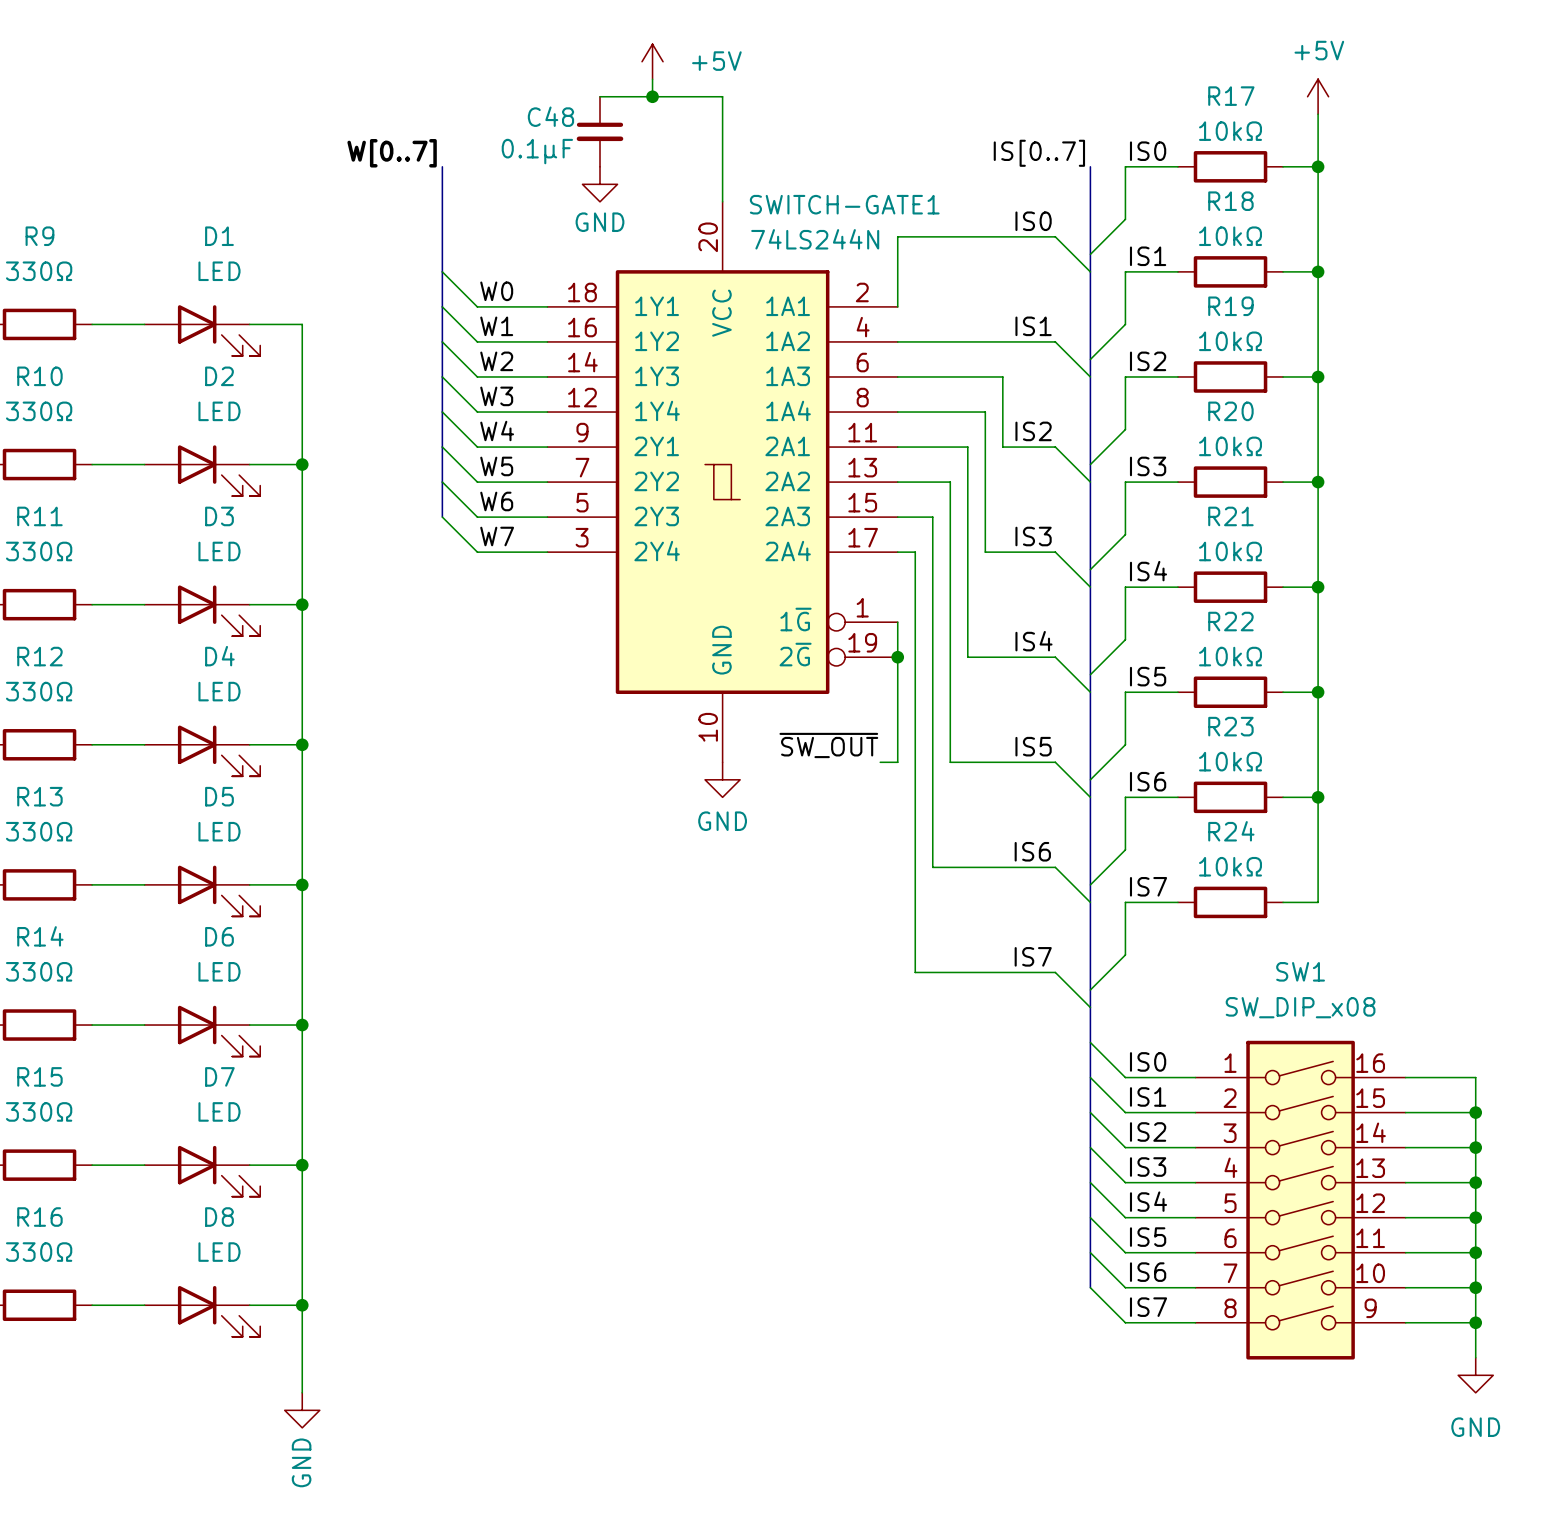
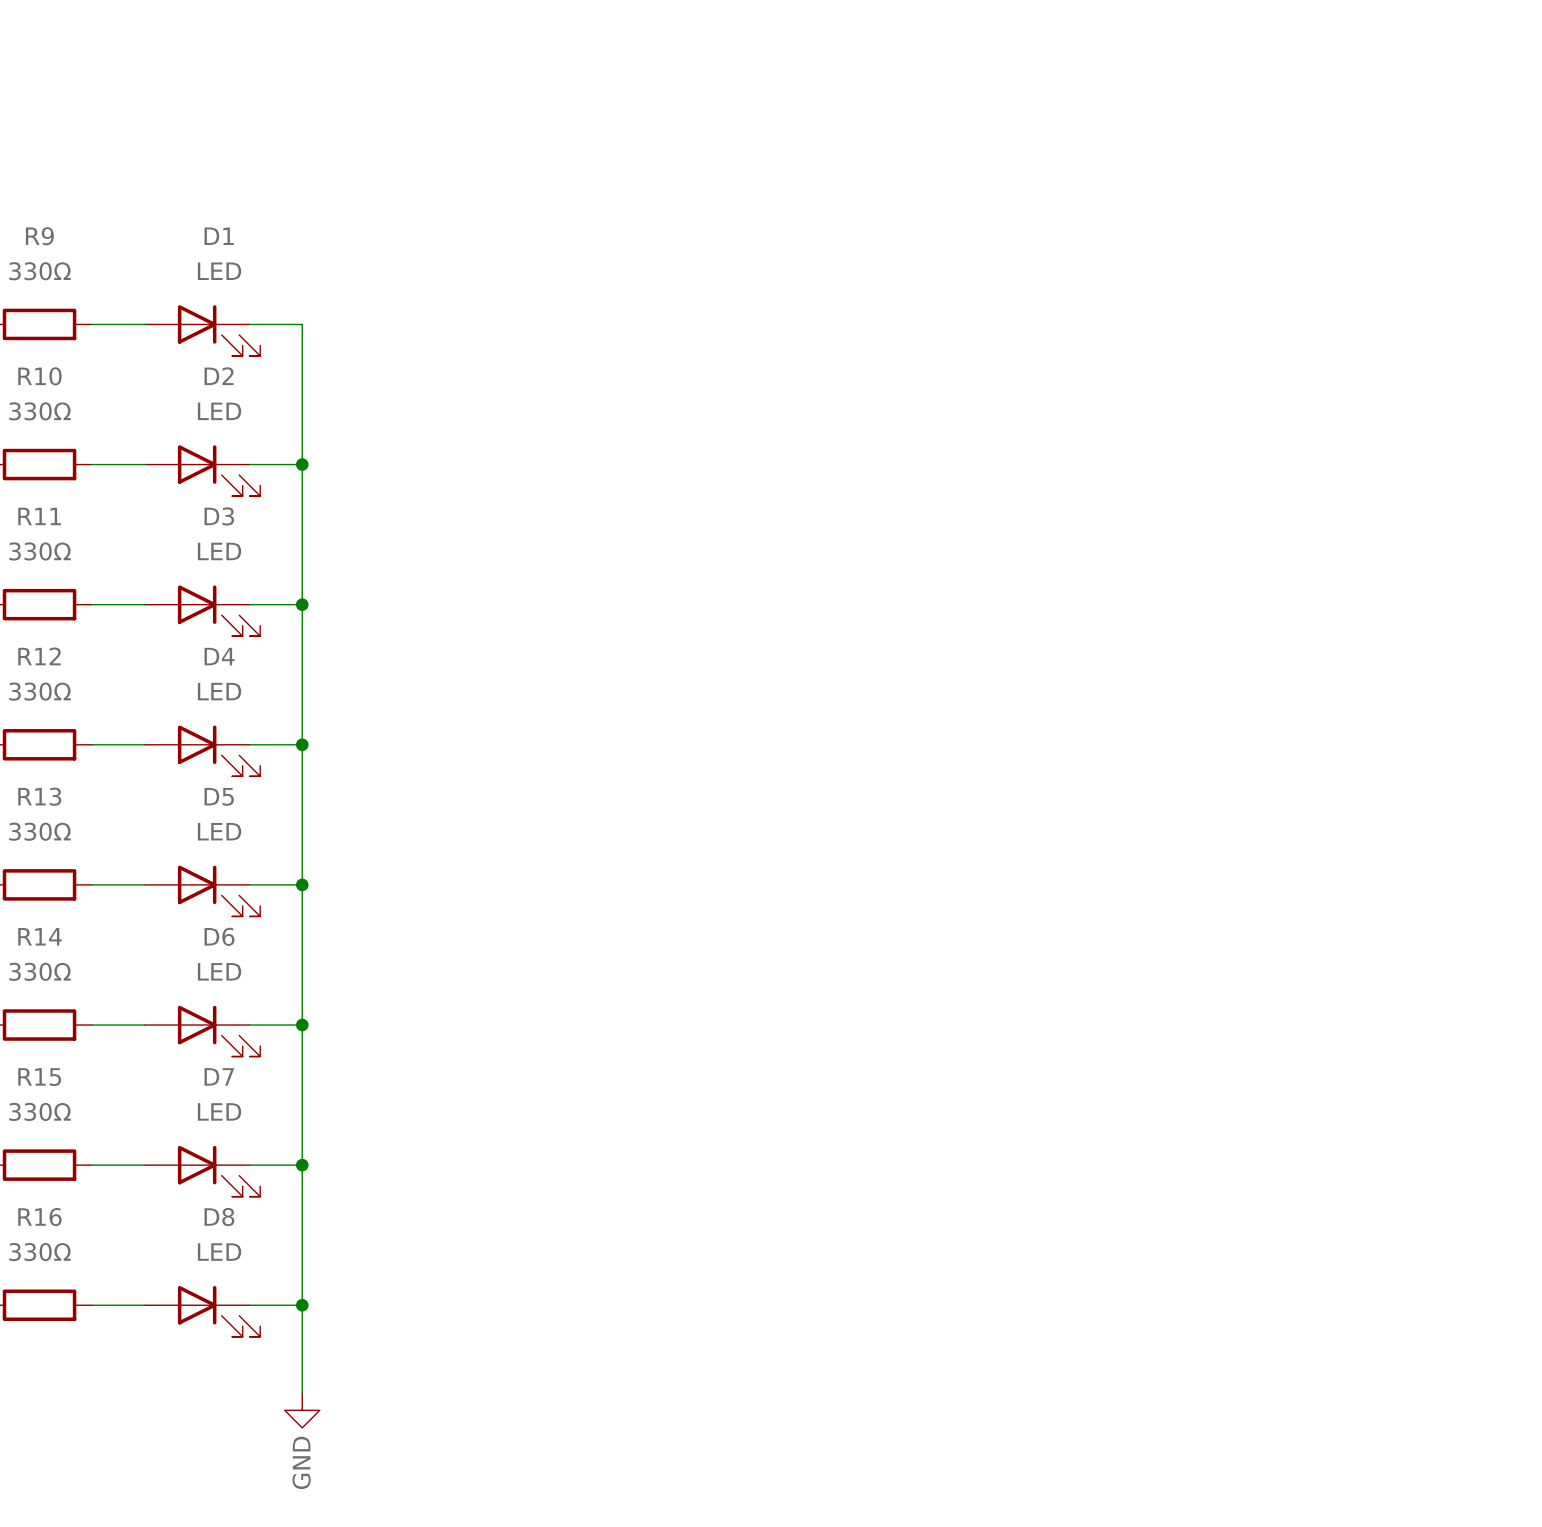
power symbol: +5V (652, 61) -> none
wire: (652, 79) (652, 96) -> none
wire: (600, 96) (722, 96) (722, 201) -> none
junction: (652, 96) -> none
power symbol: +5V (1318, 96) -> none
wire: (1318, 114) (1318, 902) (1283, 902) -> none
C48: 0.1µF (600, 131) -> none
label: IS0 (1148, 151) -> none
label: W[0..7] (392, 153) -> none
label: IS[0..7] (1039, 153) -> none
bus: (442, 166) (442, 517) -> none
bus: (1090, 166) (1090, 1287) -> none
wire: (1177, 166) (1125, 166) (1125, 219) (1090, 254) -> none
R17: 10kΩ (1230, 166) -> none
wire: (1283, 166) (1318, 166) -> none
junction: (1318, 166) -> none
power symbol: GND (600, 184) -> none
label: IS0 (1033, 221) -> none
label: IS1 (1148, 256) -> none
wire: (442, 271) (477, 306) (547, 306) -> none
wire: (1090, 271) (1055, 236) (897, 236) (897, 306) -> none
wire: (1177, 271) (1125, 271) (1125, 324) (1090, 359) -> none
R18: 10kΩ (1230, 271) -> none
wire: (1283, 271) (1318, 271) -> none
junction: (1318, 271) -> none
label: W0 (496, 291) -> none
wire: (442, 306) (477, 341) (547, 341) -> none
label: W1 (496, 326) -> none
label: IS1 (1033, 326) -> none
wire: (442, 341) (477, 376) (547, 376) -> none
wire: (897, 341) (1055, 341) (1090, 376) -> none
label: W2 (496, 361) -> none
label: IS2 (1148, 361) -> none
wire: (442, 376) (477, 412) (547, 412) -> none
wire: (897, 376) (1002, 376) (1002, 447) (1055, 447) (1090, 482) -> none
wire: (1177, 376) (1125, 376) (1125, 429) (1090, 464) -> none
R19: 10kΩ (1230, 376) -> none
wire: (1283, 376) (1318, 376) -> none
junction: (1318, 376) -> none
label: W3 (496, 396) -> none
wire: (442, 412) (477, 447) (547, 447) -> none
wire: (897, 412) (985, 412) (985, 552) (1055, 552) (1090, 587) -> none
label: W4 (497, 431) -> none
label: IS2 (1033, 431) -> none
wire: (442, 447) (477, 482) (547, 482) -> none
wire: (897, 447) (967, 447) (967, 657) (1055, 657) (1090, 692) -> none
label: W5 (496, 466) -> none
label: IS3 (1148, 466) -> none
wire: (442, 482) (477, 517) (547, 517) -> none
SWITCH-GATE1: 74LS244N (722, 482) -> none
wire: (897, 482) (950, 482) (950, 762) (1055, 762) (1090, 797) -> none
wire: (1177, 482) (1125, 482) (1125, 534) (1090, 569) -> none
R20: 10kΩ (1230, 482) -> none
wire: (1283, 482) (1318, 482) -> none
junction: (1318, 482) -> none
label: W6 (496, 501) -> none
wire: (442, 517) (477, 552) (547, 552) -> none
wire: (897, 517) (932, 517) (932, 867) (1055, 867) (1090, 902) -> none
label: W7 (497, 536) -> none
label: IS3 (1033, 536) -> none
wire: (897, 552) (915, 552) (915, 972) (1055, 972) (1090, 1007) -> none
label: IS4 (1148, 571) -> none
wire: (1177, 587) (1125, 587) (1125, 639) (1090, 674) -> none
R21: 10kΩ (1230, 587) -> none
wire: (1283, 587) (1318, 587) -> none
junction: (1318, 587) -> none
wire: (897, 622) (897, 762) (880, 762) -> none
label: IS4 (1033, 641) -> none
junction: (897, 657) -> none
label: IS5 (1148, 676) -> none
wire: (1177, 692) (1125, 692) (1125, 744) (1090, 779) -> none
R22: 10kΩ (1230, 692) -> none
wire: (1283, 692) (1318, 692) -> none
junction: (1318, 692) -> none
label: ~{SW_OUT} (828, 745) -> none
label: IS5 (1033, 746) -> none
power symbol: GND (722, 779) -> none
label: IS6 (1148, 781) -> none
wire: (1177, 797) (1125, 797) (1125, 849) (1090, 884) -> none
R23: 10kΩ (1230, 797) -> none
wire: (1283, 797) (1318, 797) -> none
junction: (1318, 797) -> none
label: IS6 (1032, 851) -> none
label: IS7 (1148, 886) -> none
wire: (1177, 902) (1125, 902) (1125, 954) (1090, 989) -> none
R24: 10kΩ (1230, 902) -> none
label: IS7 (1033, 956) -> none
wire: (1090, 1042) (1125, 1077) (1195, 1077) -> none
label: IS0 (1148, 1061) -> none
wire: (1090, 1077) (1125, 1112) (1195, 1112) -> none
wire: (1405, 1077) (1475, 1077) (1475, 1357) -> none
label: IS1 (1148, 1096) -> none
wire: (1090, 1112) (1125, 1147) (1195, 1147) -> none
wire: (1405, 1112) (1475, 1112) -> none
junction: (1475, 1112) -> none
label: IS2 (1148, 1131) -> none
wire: (1090, 1147) (1125, 1182) (1195, 1182) -> none
wire: (1405, 1147) (1475, 1147) -> none
junction: (1475, 1147) -> none
label: IS3 (1148, 1167) -> none
wire: (1090, 1182) (1125, 1217) (1195, 1217) -> none
wire: (1405, 1182) (1475, 1182) -> none
junction: (1475, 1182) -> none
SW1: SW_DIP_x08 (1300, 1200) -> none
label: IS4 (1148, 1201) -> none
wire: (1090, 1217) (1125, 1252) (1195, 1252) -> none
wire: (1405, 1217) (1475, 1217) -> none
junction: (1475, 1217) -> none
label: IS5 (1148, 1237) -> none
wire: (1090, 1252) (1125, 1287) (1195, 1287) -> none
wire: (1405, 1252) (1475, 1252) -> none
junction: (1475, 1252) -> none
label: IS6 (1148, 1272) -> none
wire: (1090, 1287) (1125, 1322) (1195, 1322) -> none
wire: (1405, 1287) (1475, 1287) -> none
junction: (1475, 1287) -> none
label: IS7 (1148, 1307) -> none
wire: (1405, 1322) (1475, 1322) -> none
junction: (1475, 1322) -> none
power symbol: GND (1475, 1375) -> none

